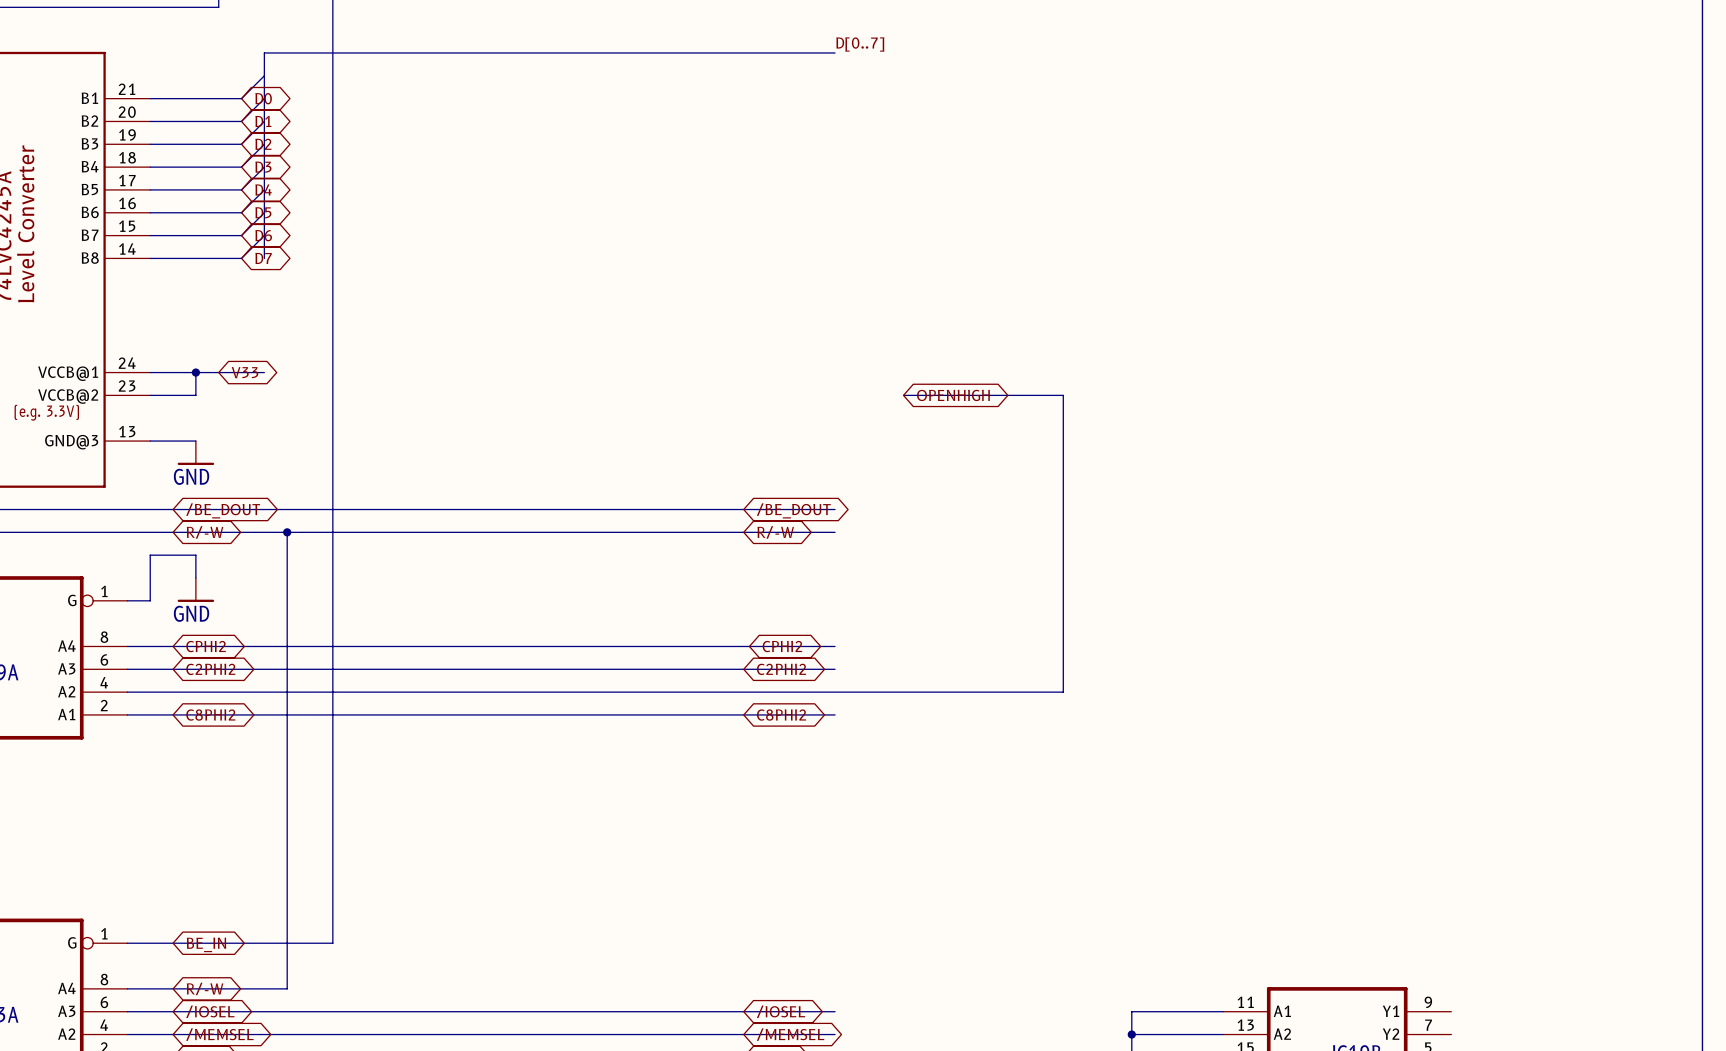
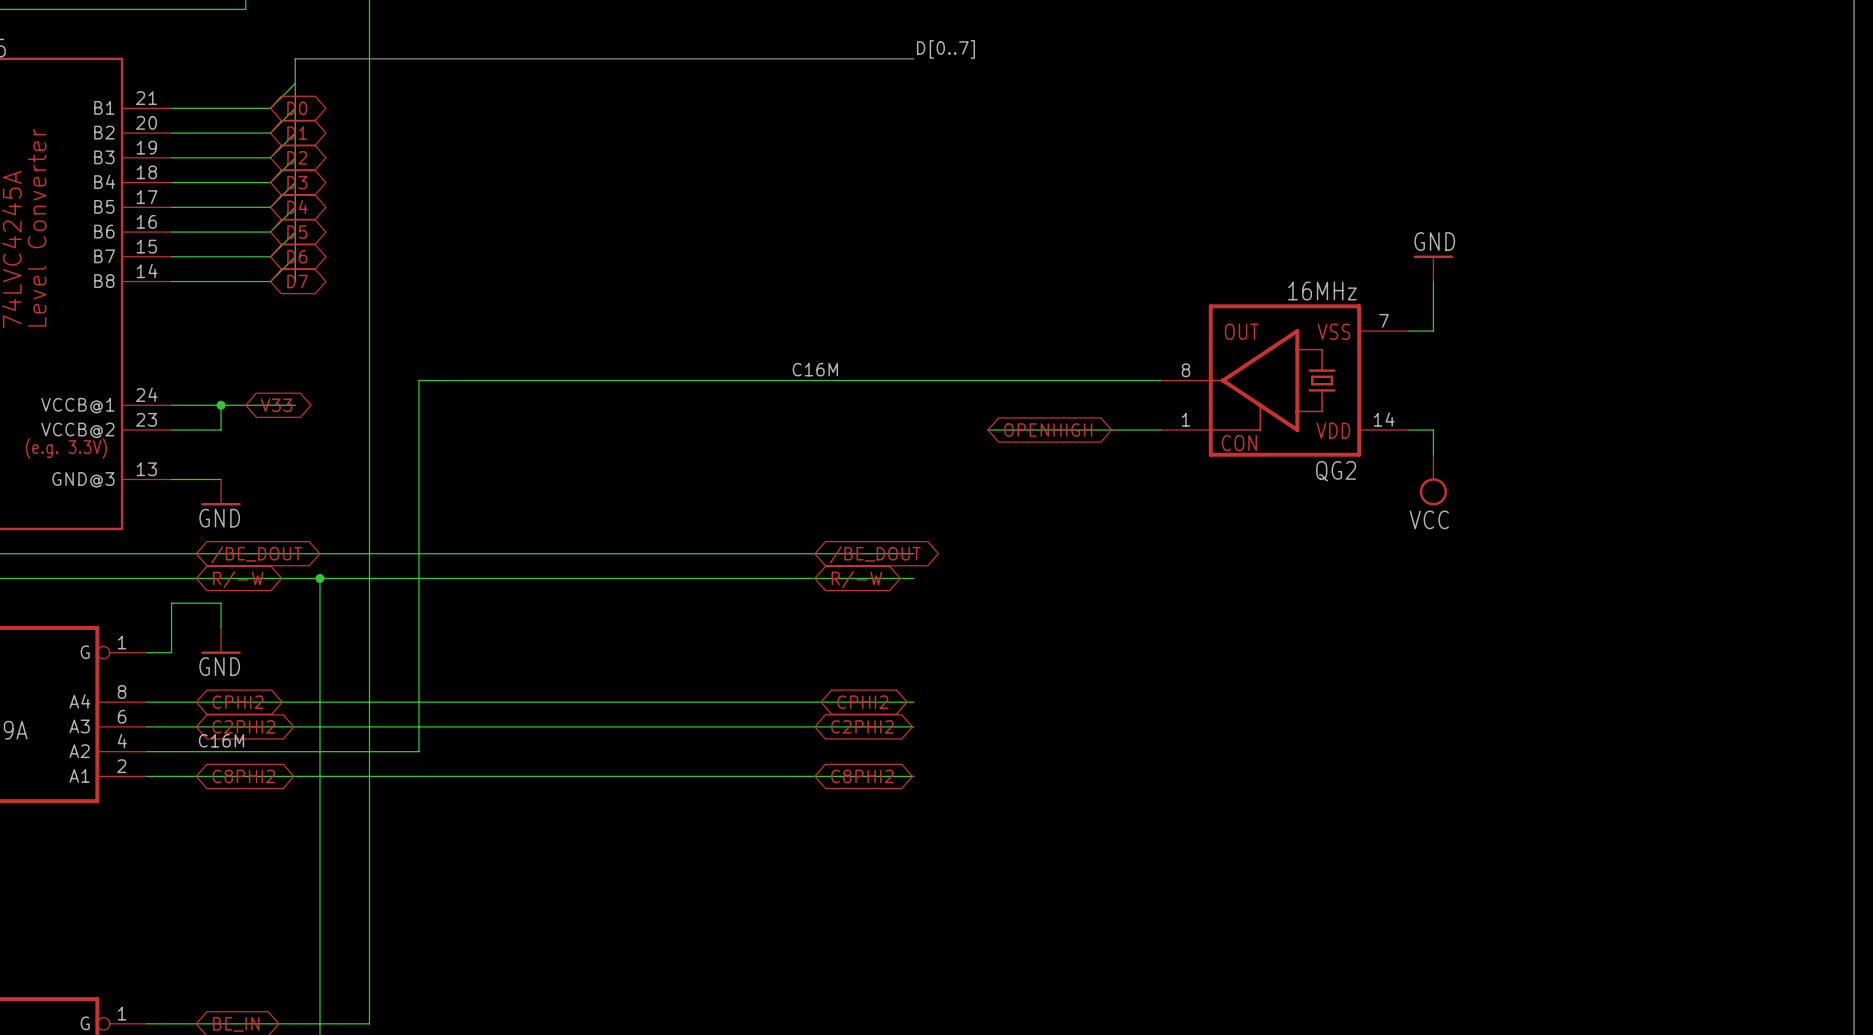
power symbol: none -> GND (1433, 268)
wire: none -> (1433, 281) (1433, 331) (1408, 331)
label: none -> C16M (815, 369)
QG2: none -> 16MHz (1284, 380)
wire: (1063, 395) (1063, 692) (378, 692) -> (1161, 380) (418, 380) (418, 751)
wire: none -> (1408, 430) (1433, 430) (1433, 454)
power symbol: none -> VCC (1433, 480)
label: none -> C16M (221, 740)

